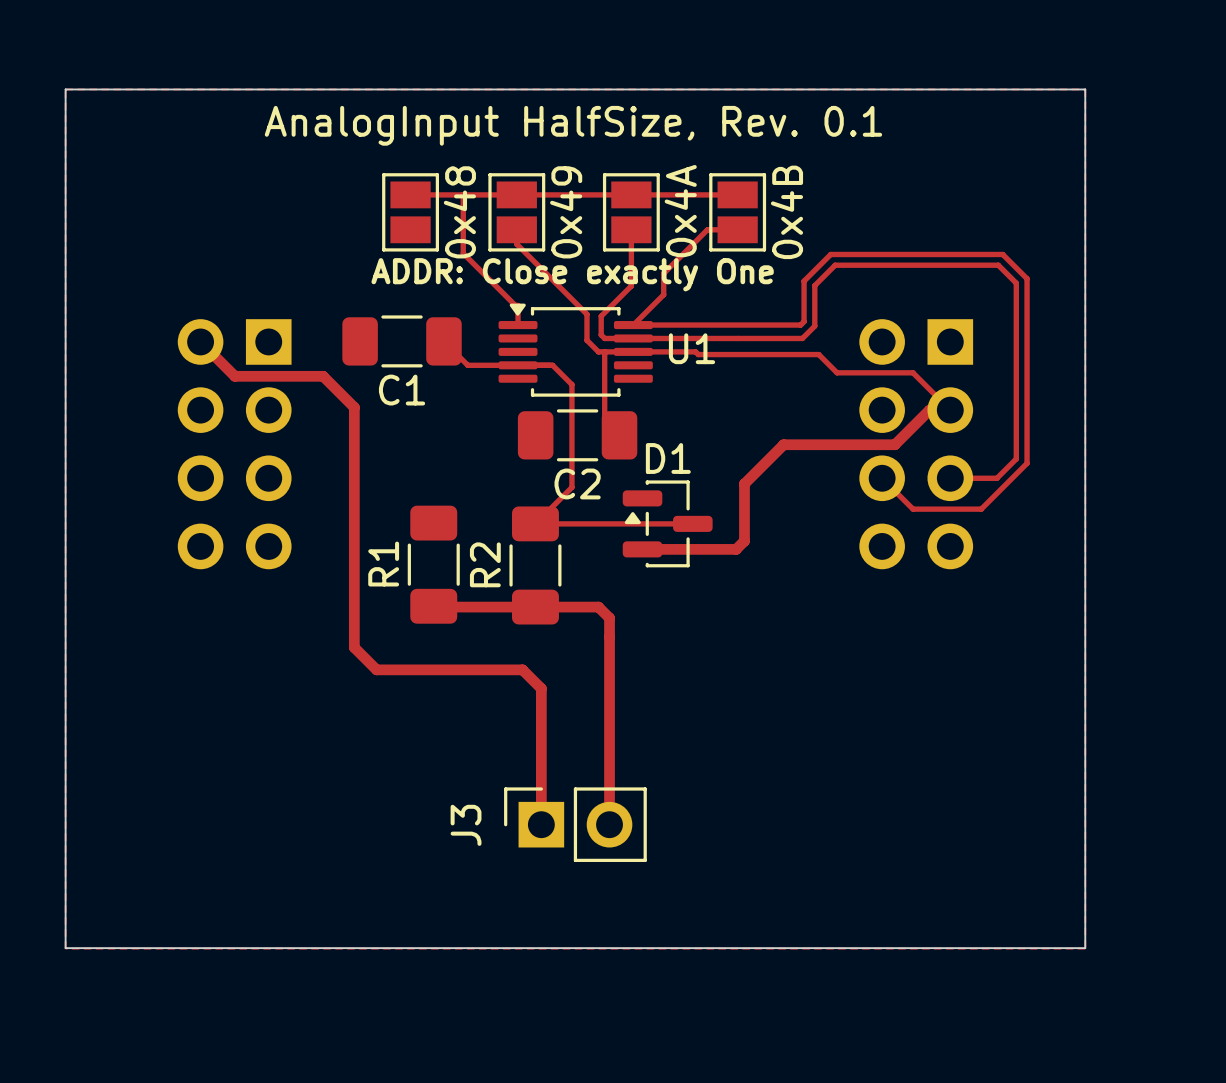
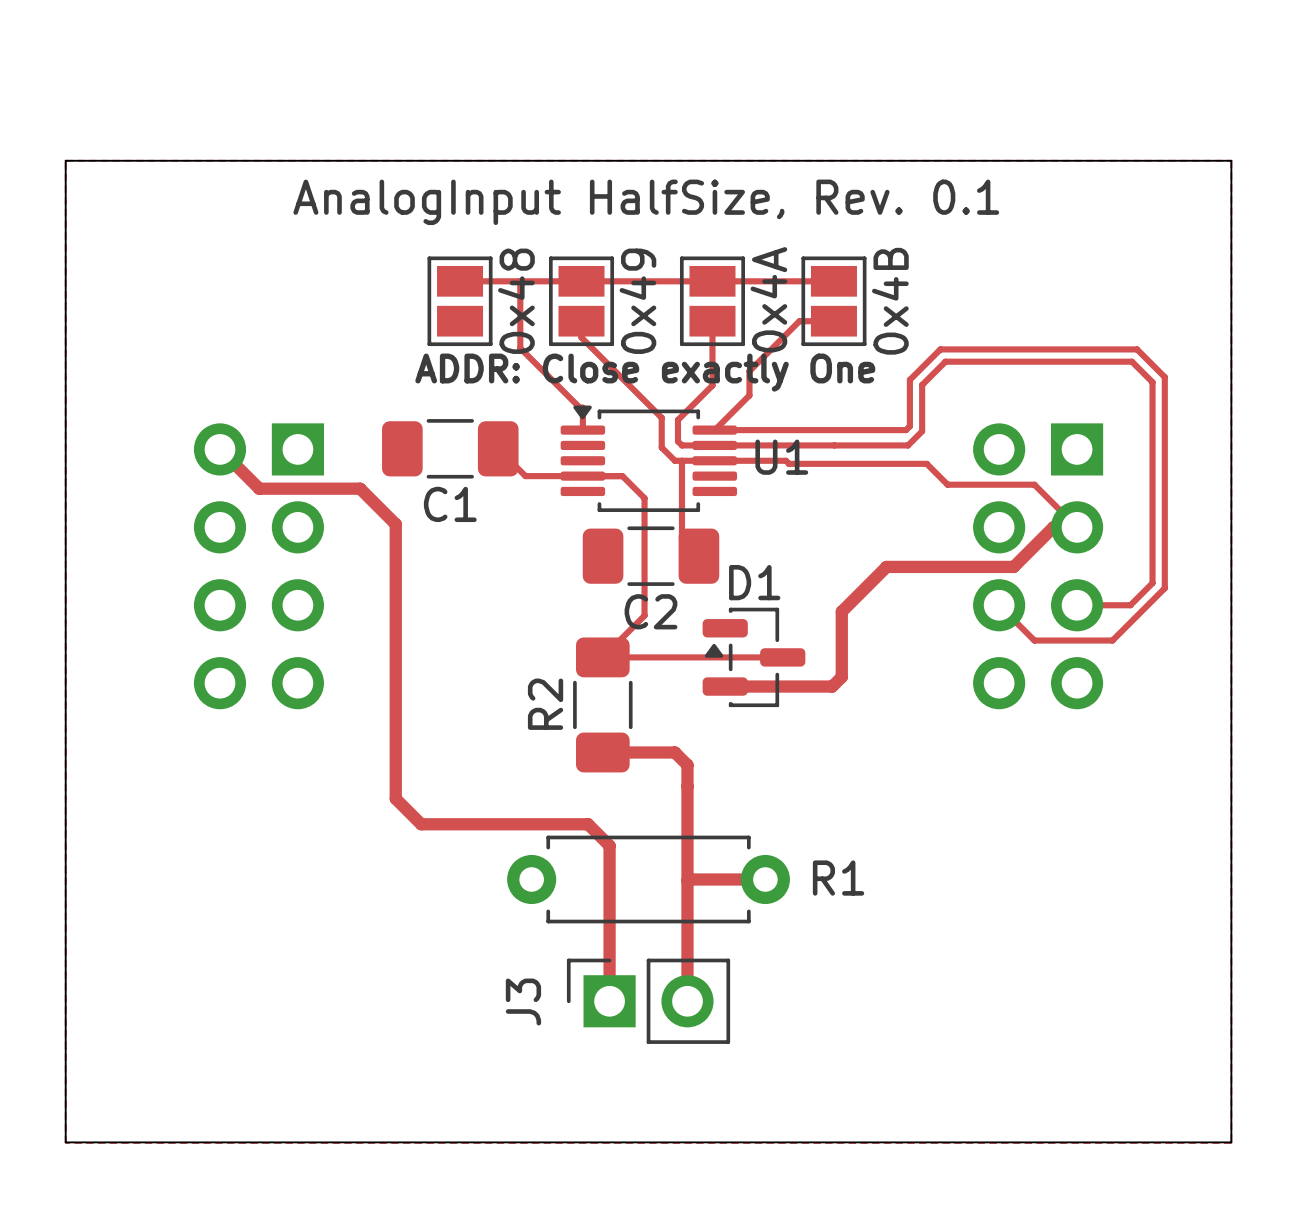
R1 footprint: [407, 505, 460, 624] -> [507, 835, 790, 924]
R1 name position: R1 (383, 564) -> R1 (838, 878)
track: (433, 606) (535, 607) -> none
track: none -> (688, 879) (765, 879)

